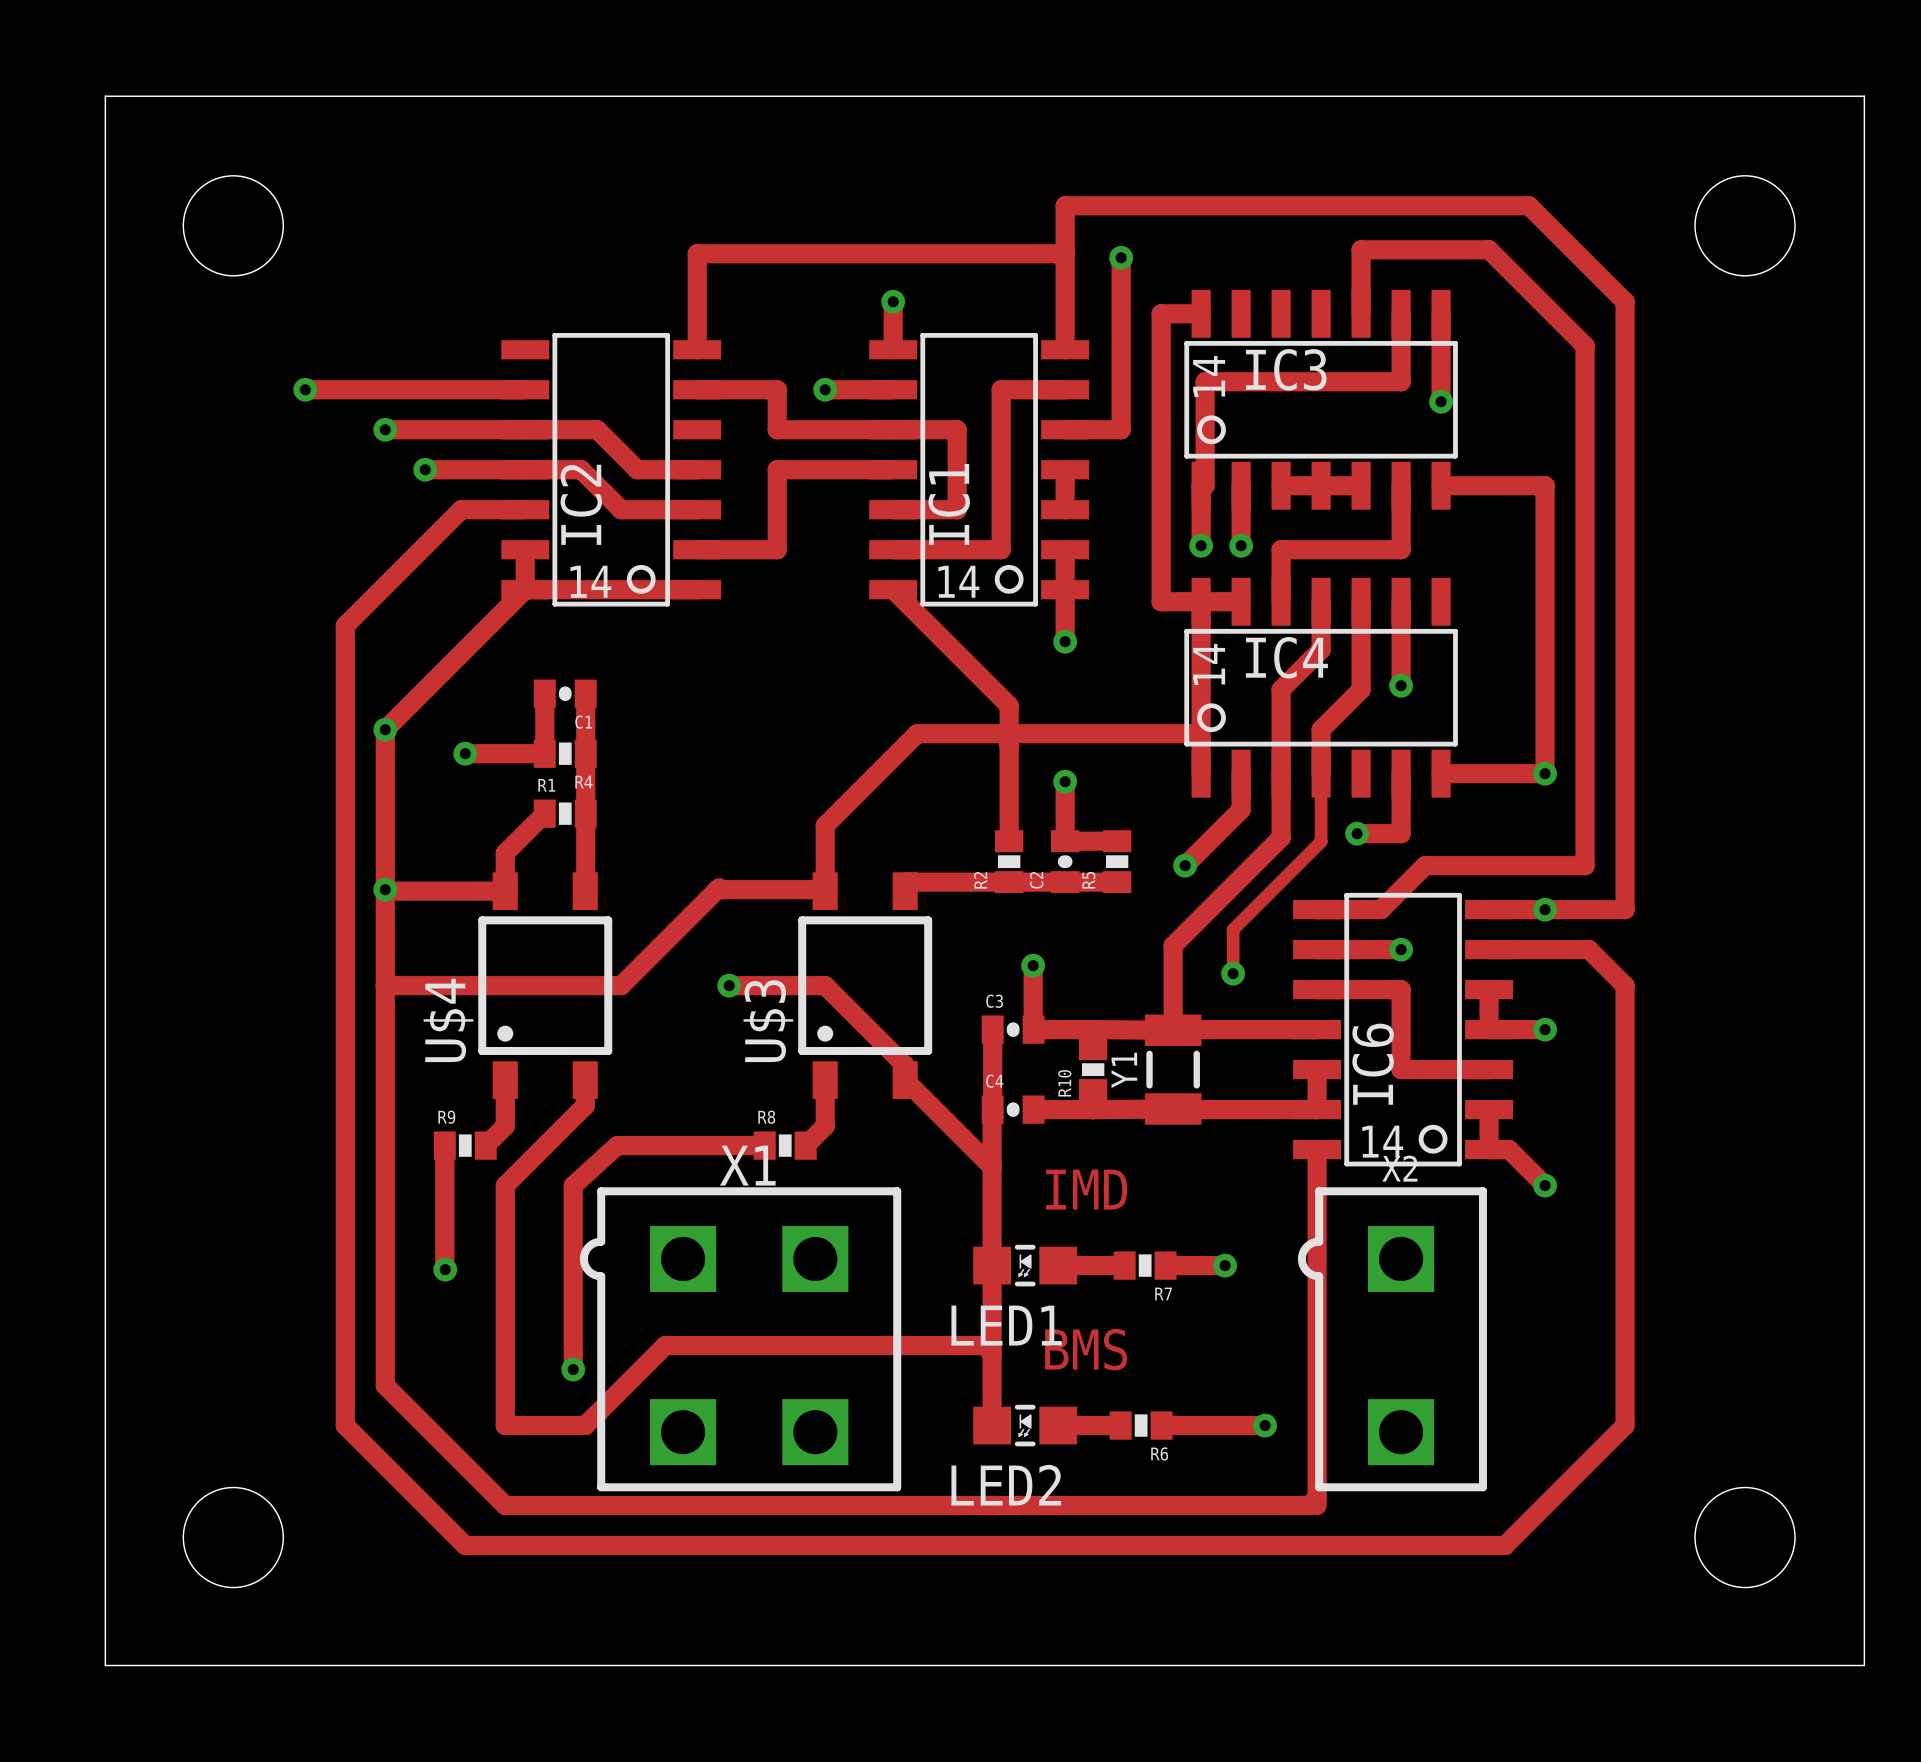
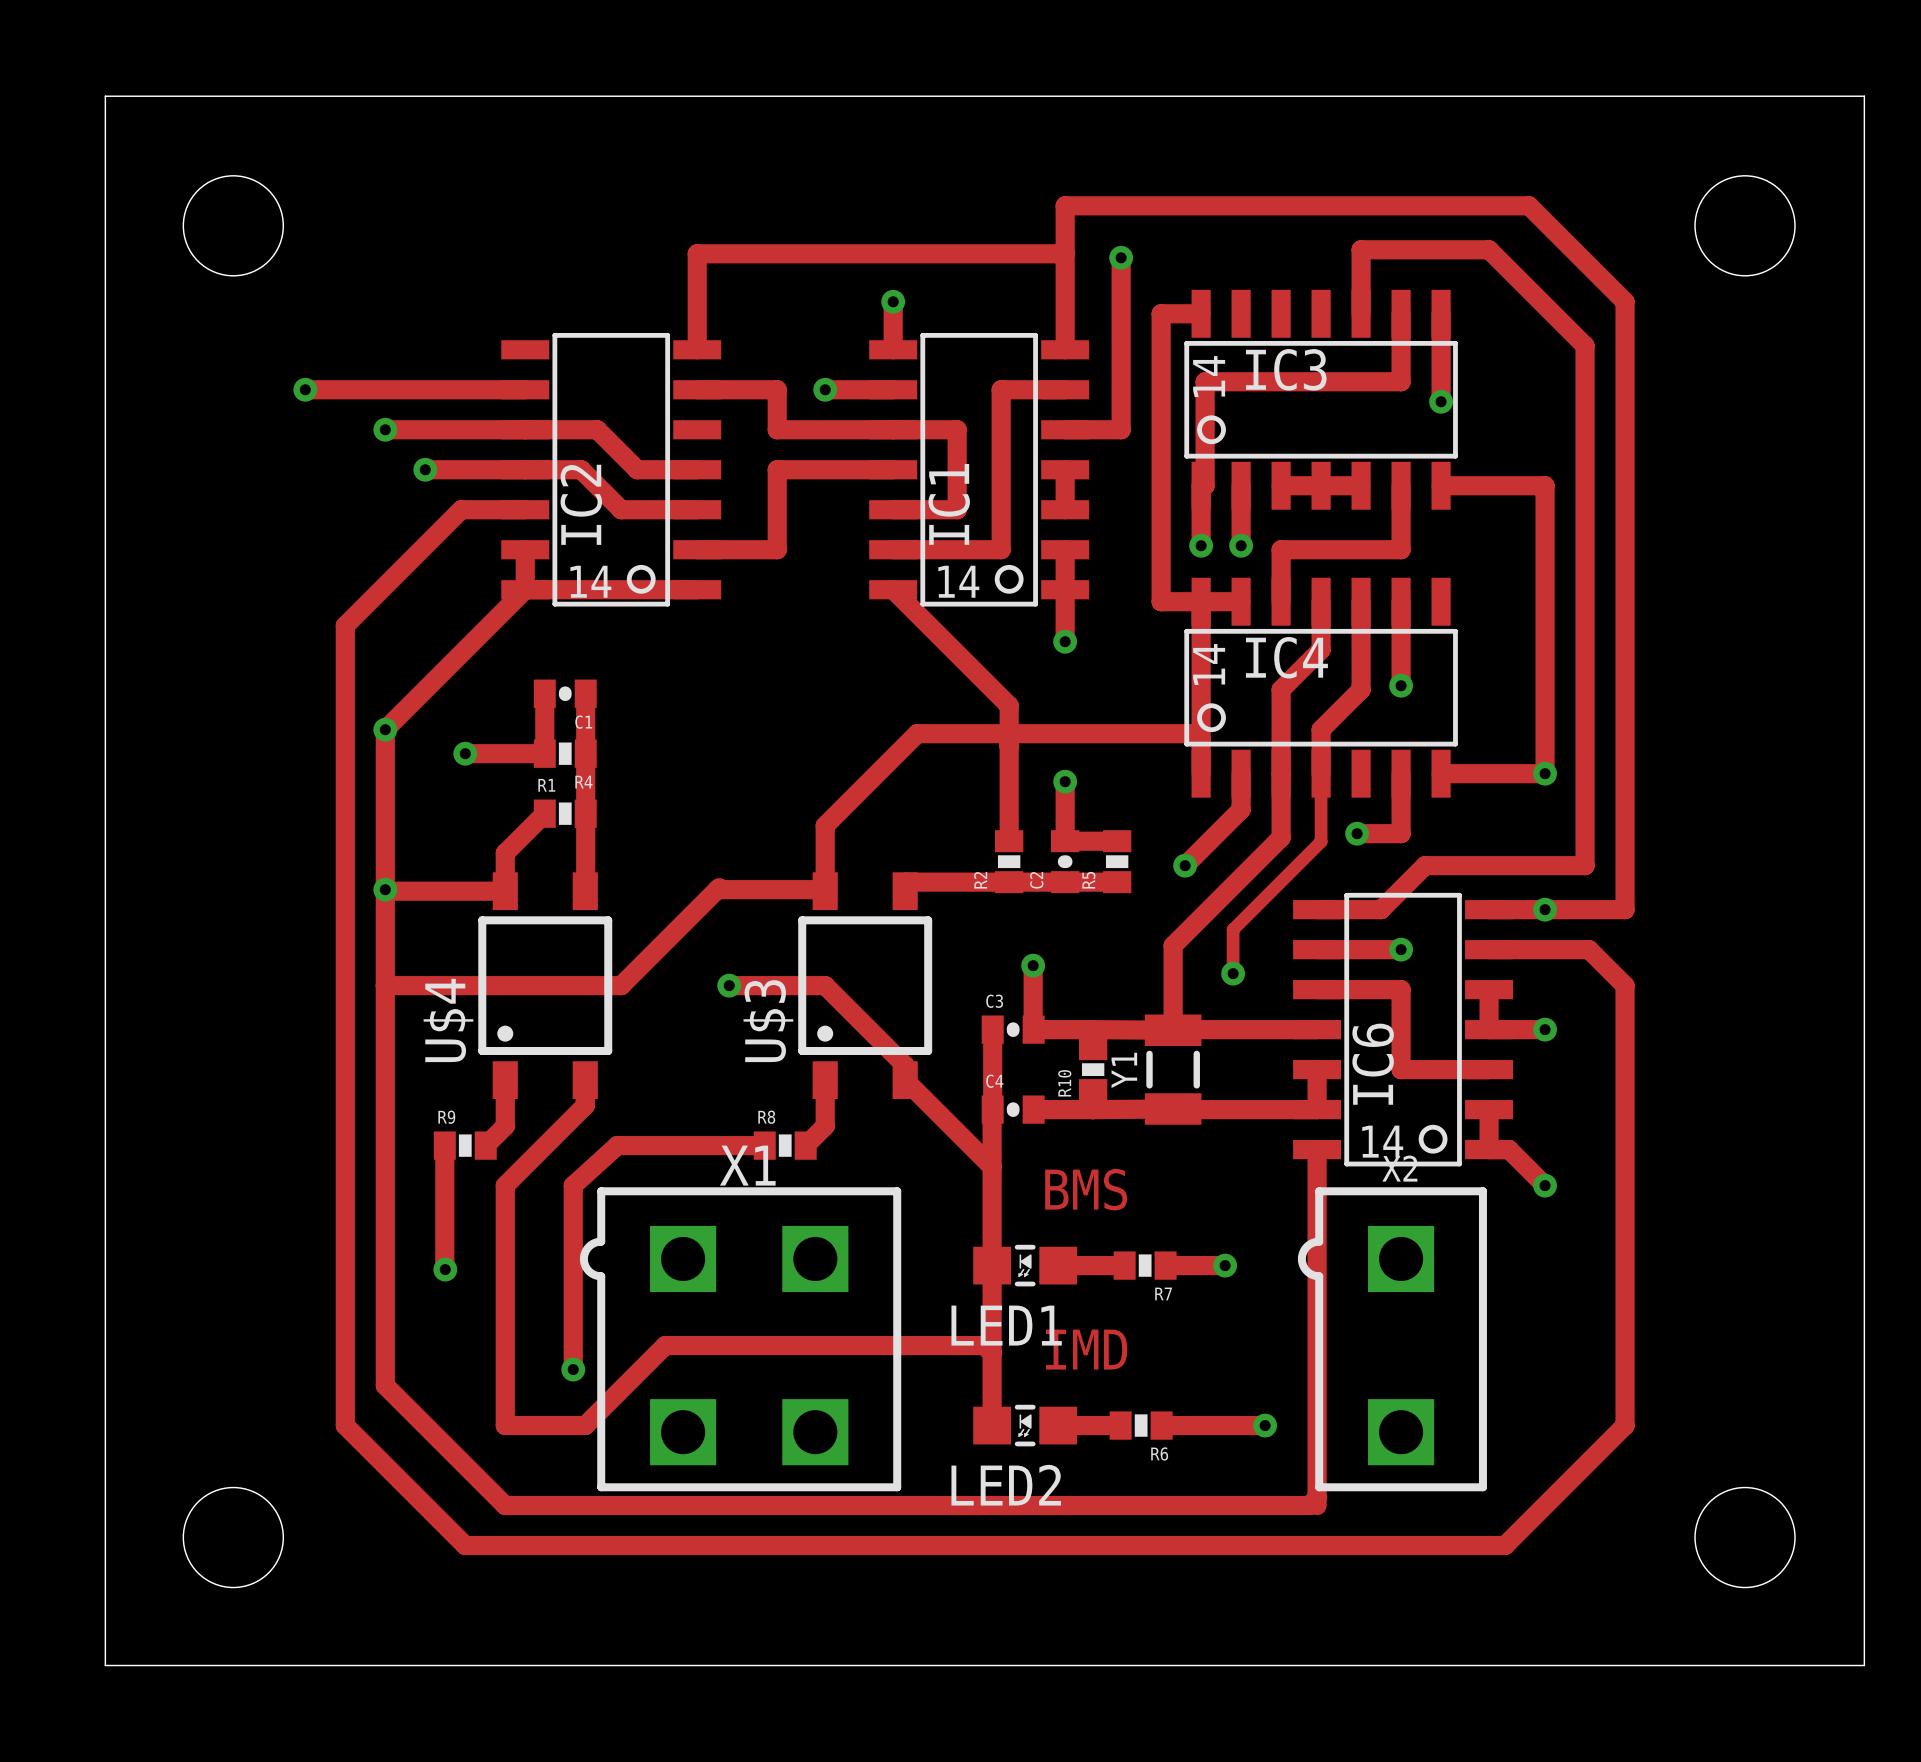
text: IMD (1086, 1189) -> BMS (1086, 1189)
text: BMS (1086, 1349) -> IMD (1086, 1349)

